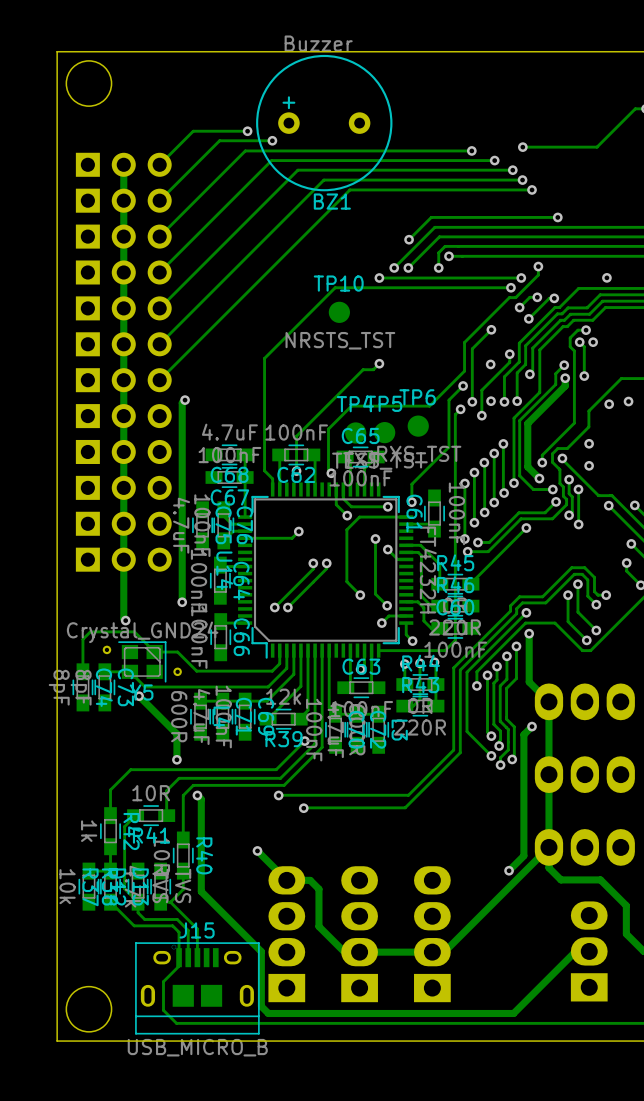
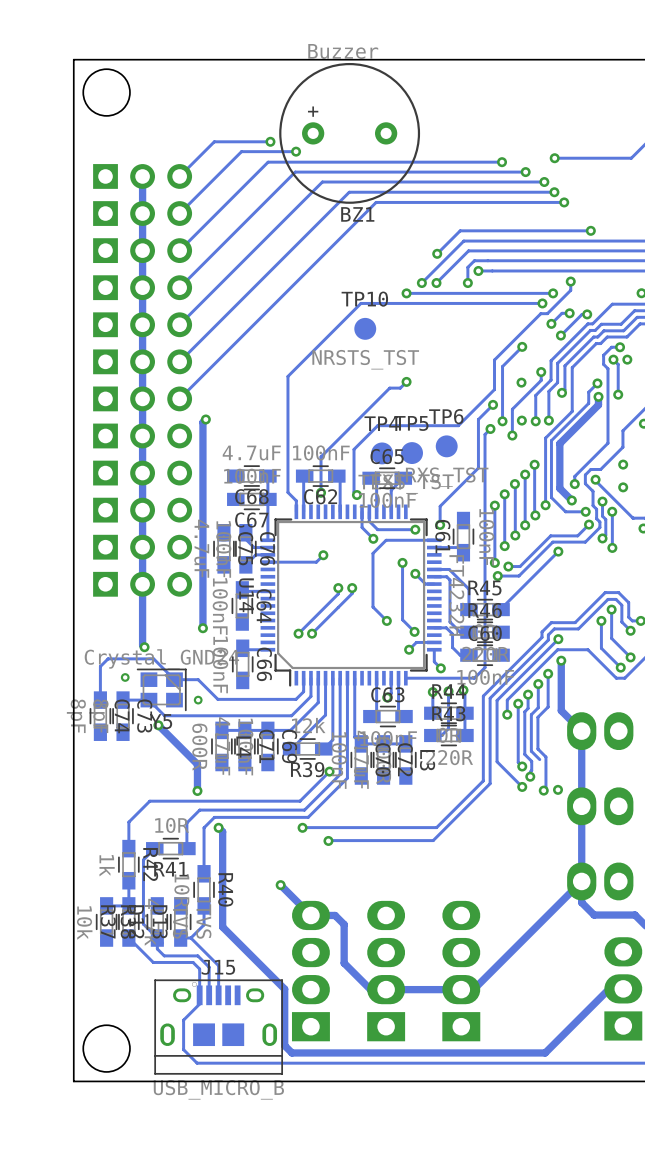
track: (532, 726) (523, 734) (523, 855) (509, 870) -> none
via: (532, 726) -> none
track: (508, 729) (508, 749) (500, 757) (500, 765) -> none
via: none -> (558, 789)
via: (500, 765) -> none
via: (509, 870) -> none

